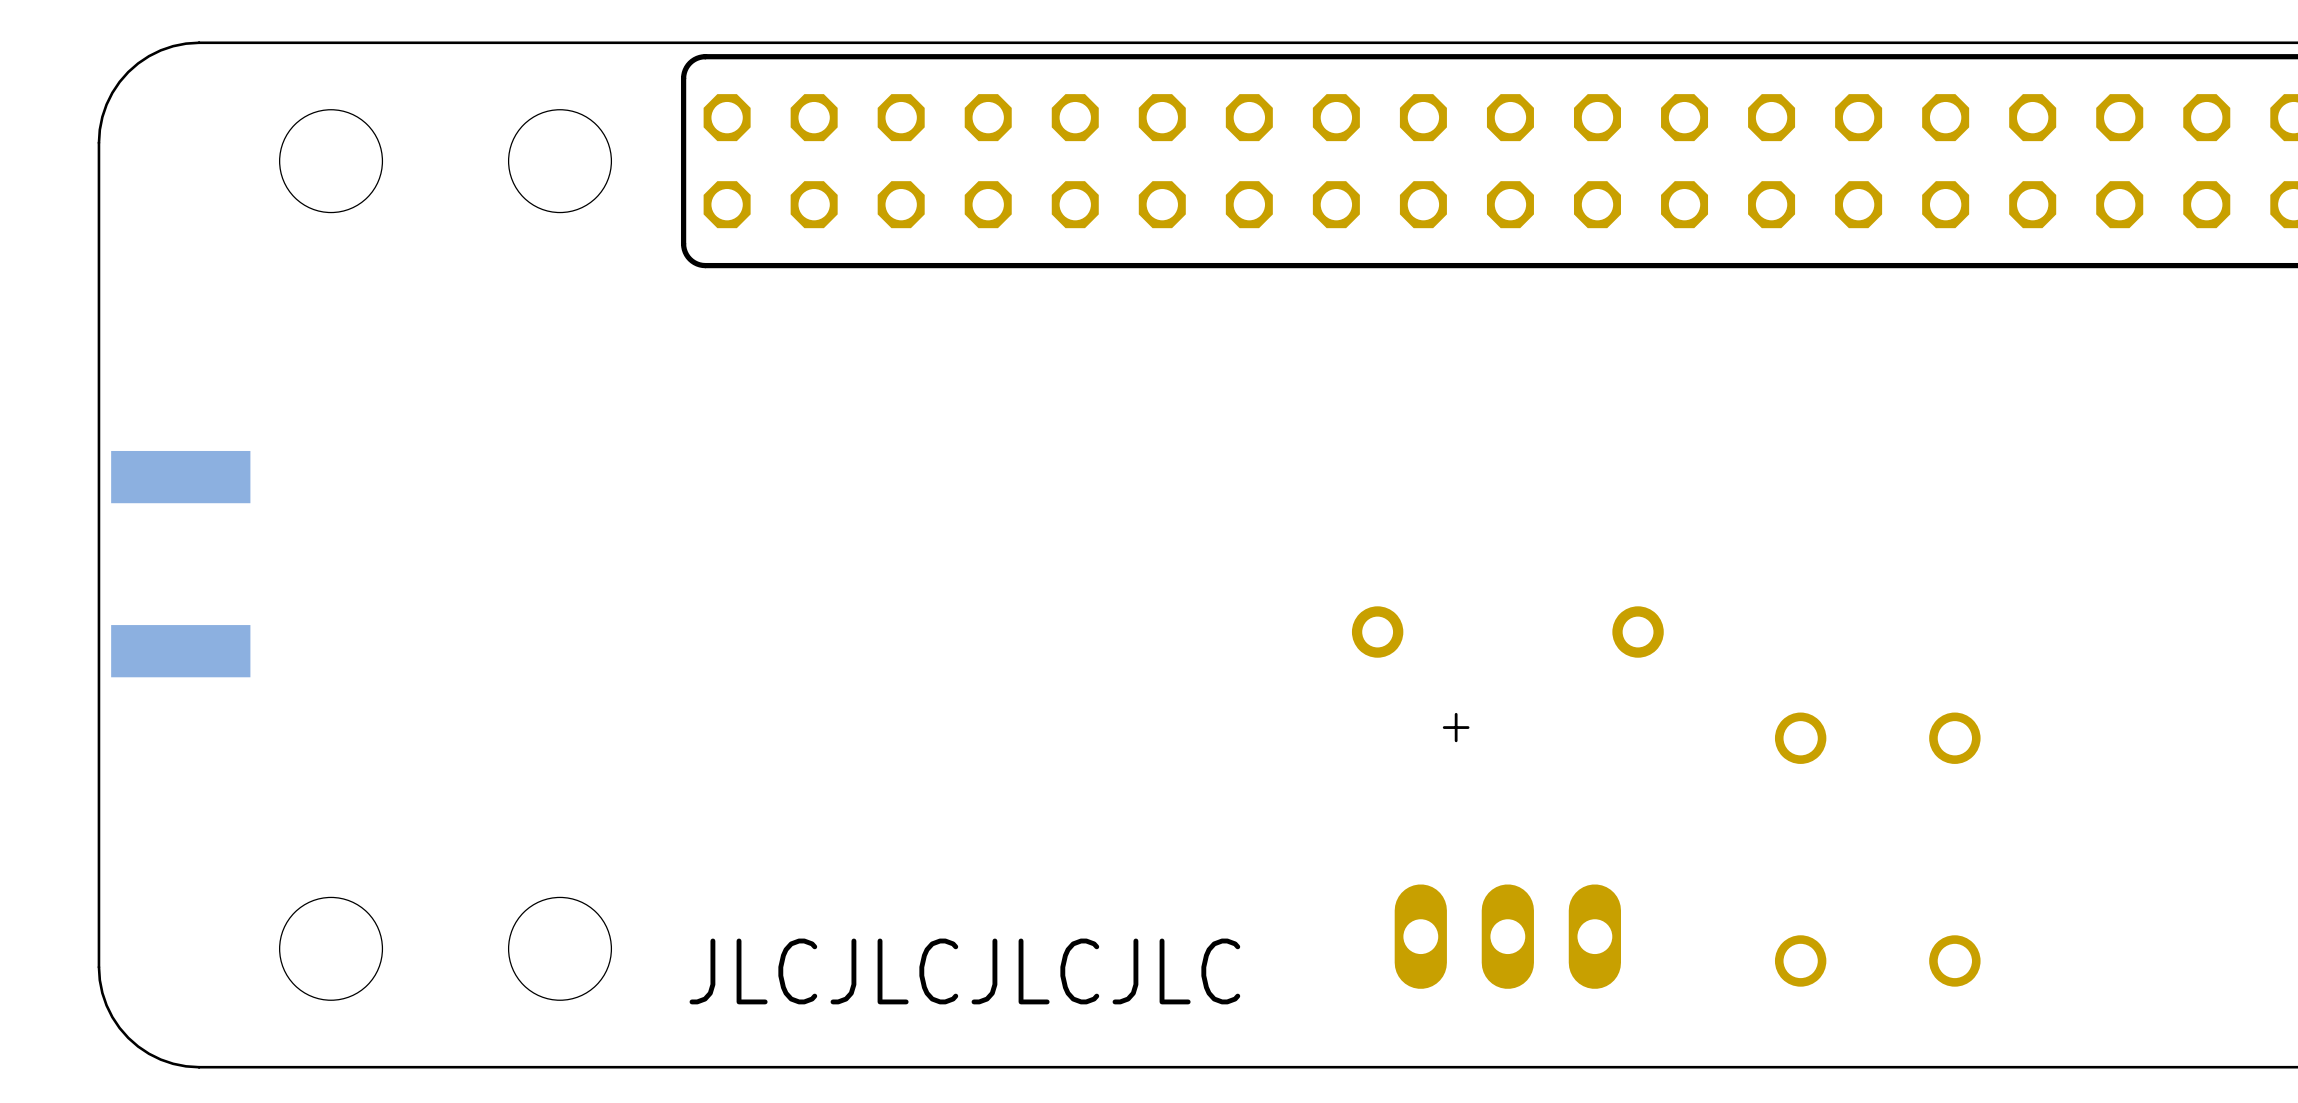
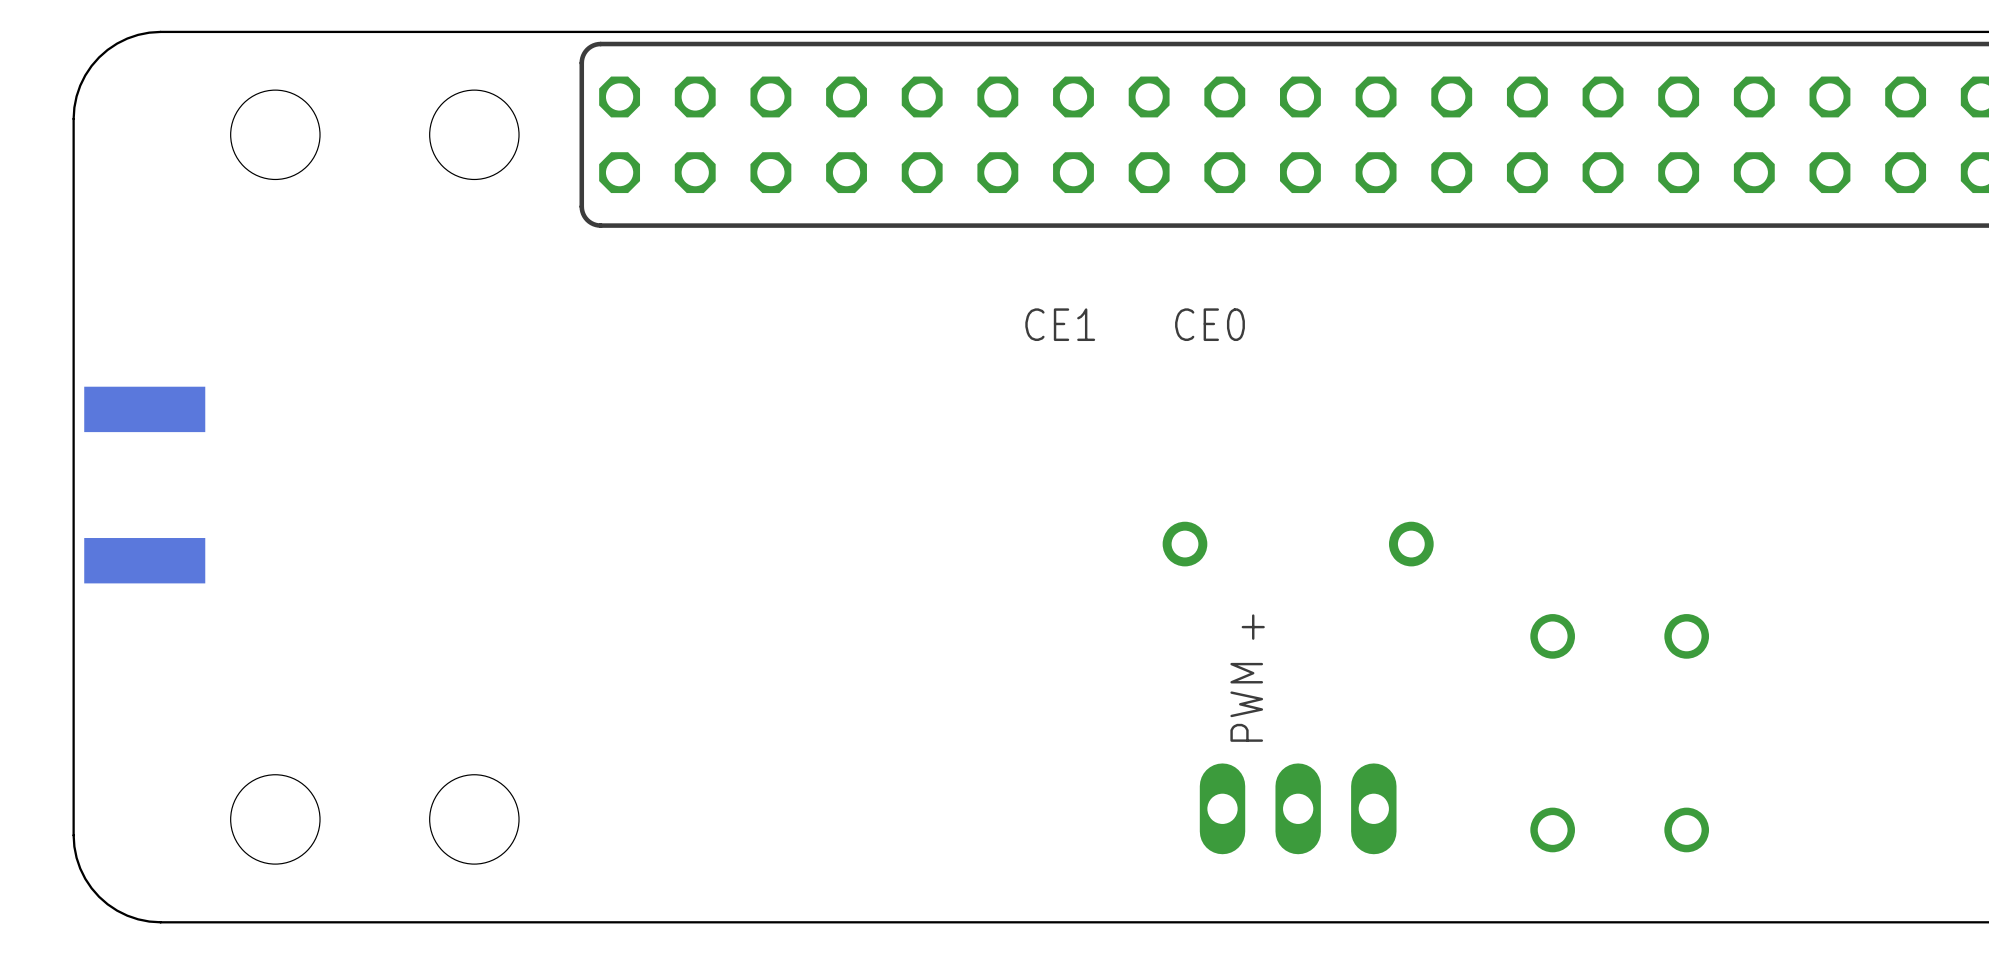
text: none -> CE1 (1060, 324)
text: none -> CE0 (1210, 324)
text: none -> PWM (1246, 702)
text: JLCJLCJLCJLC (964, 971) -> none

